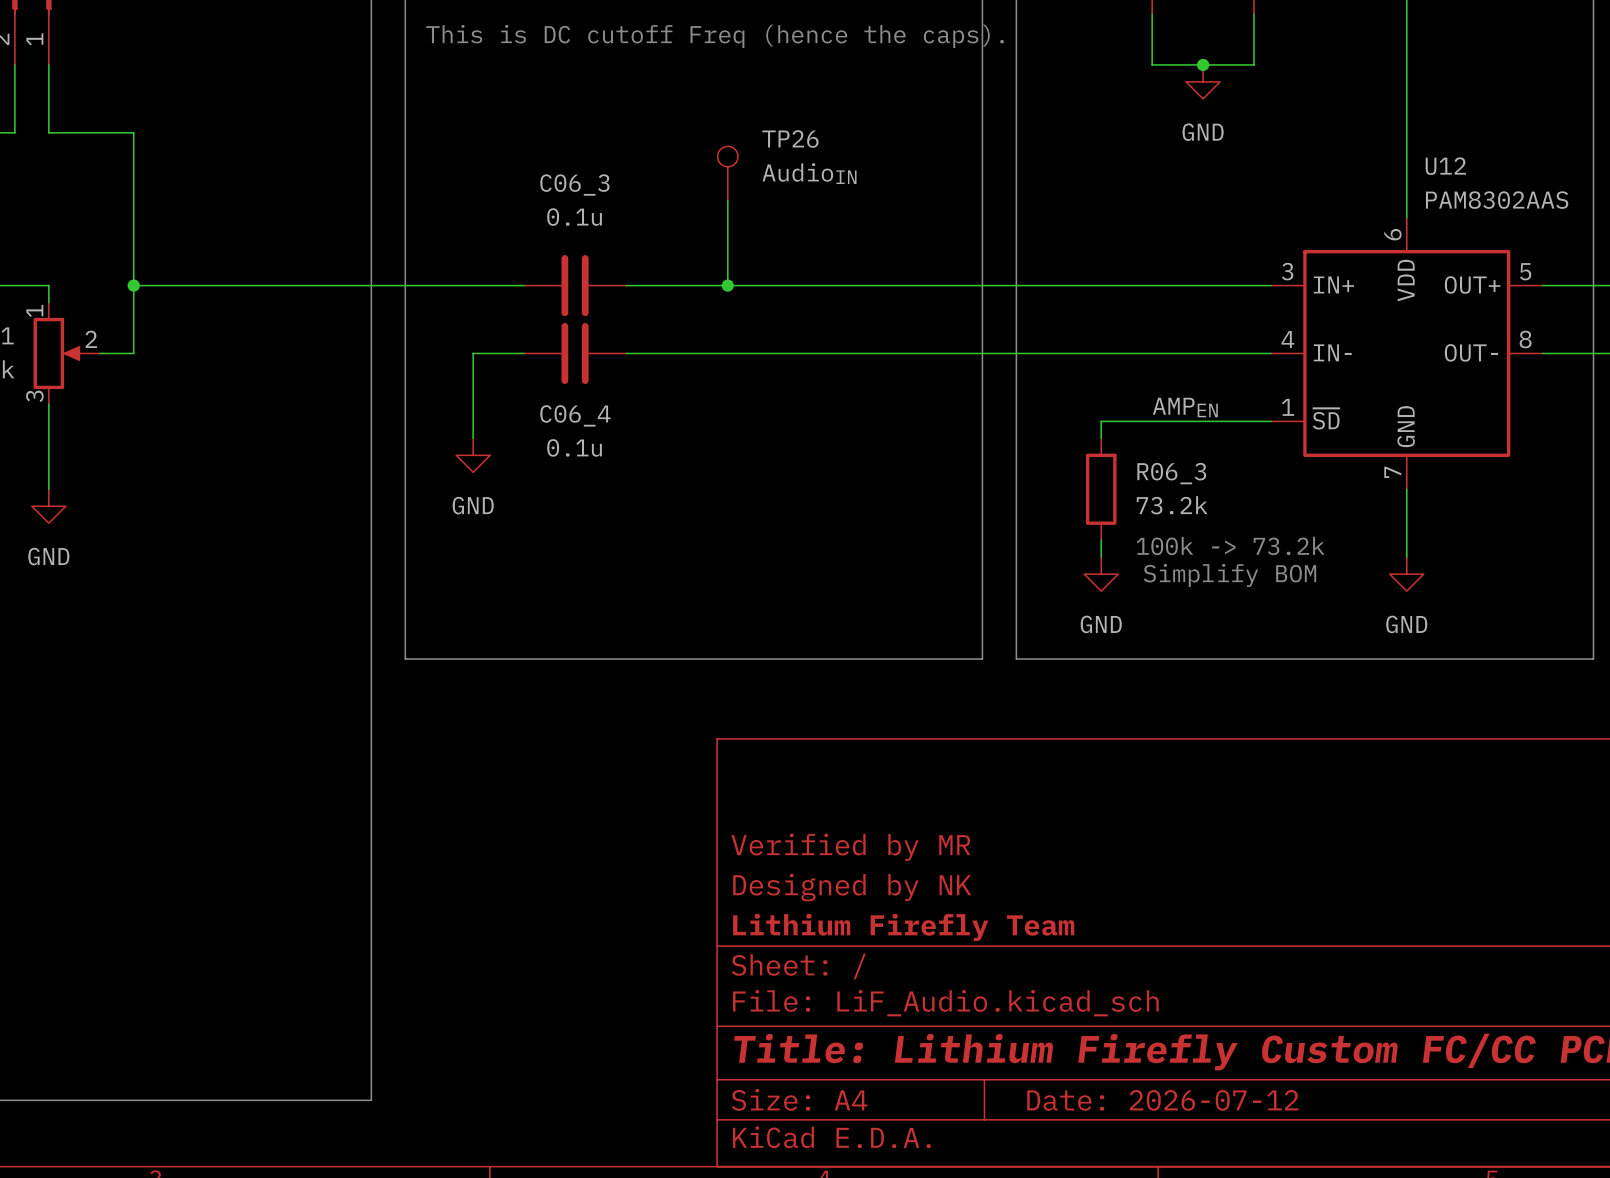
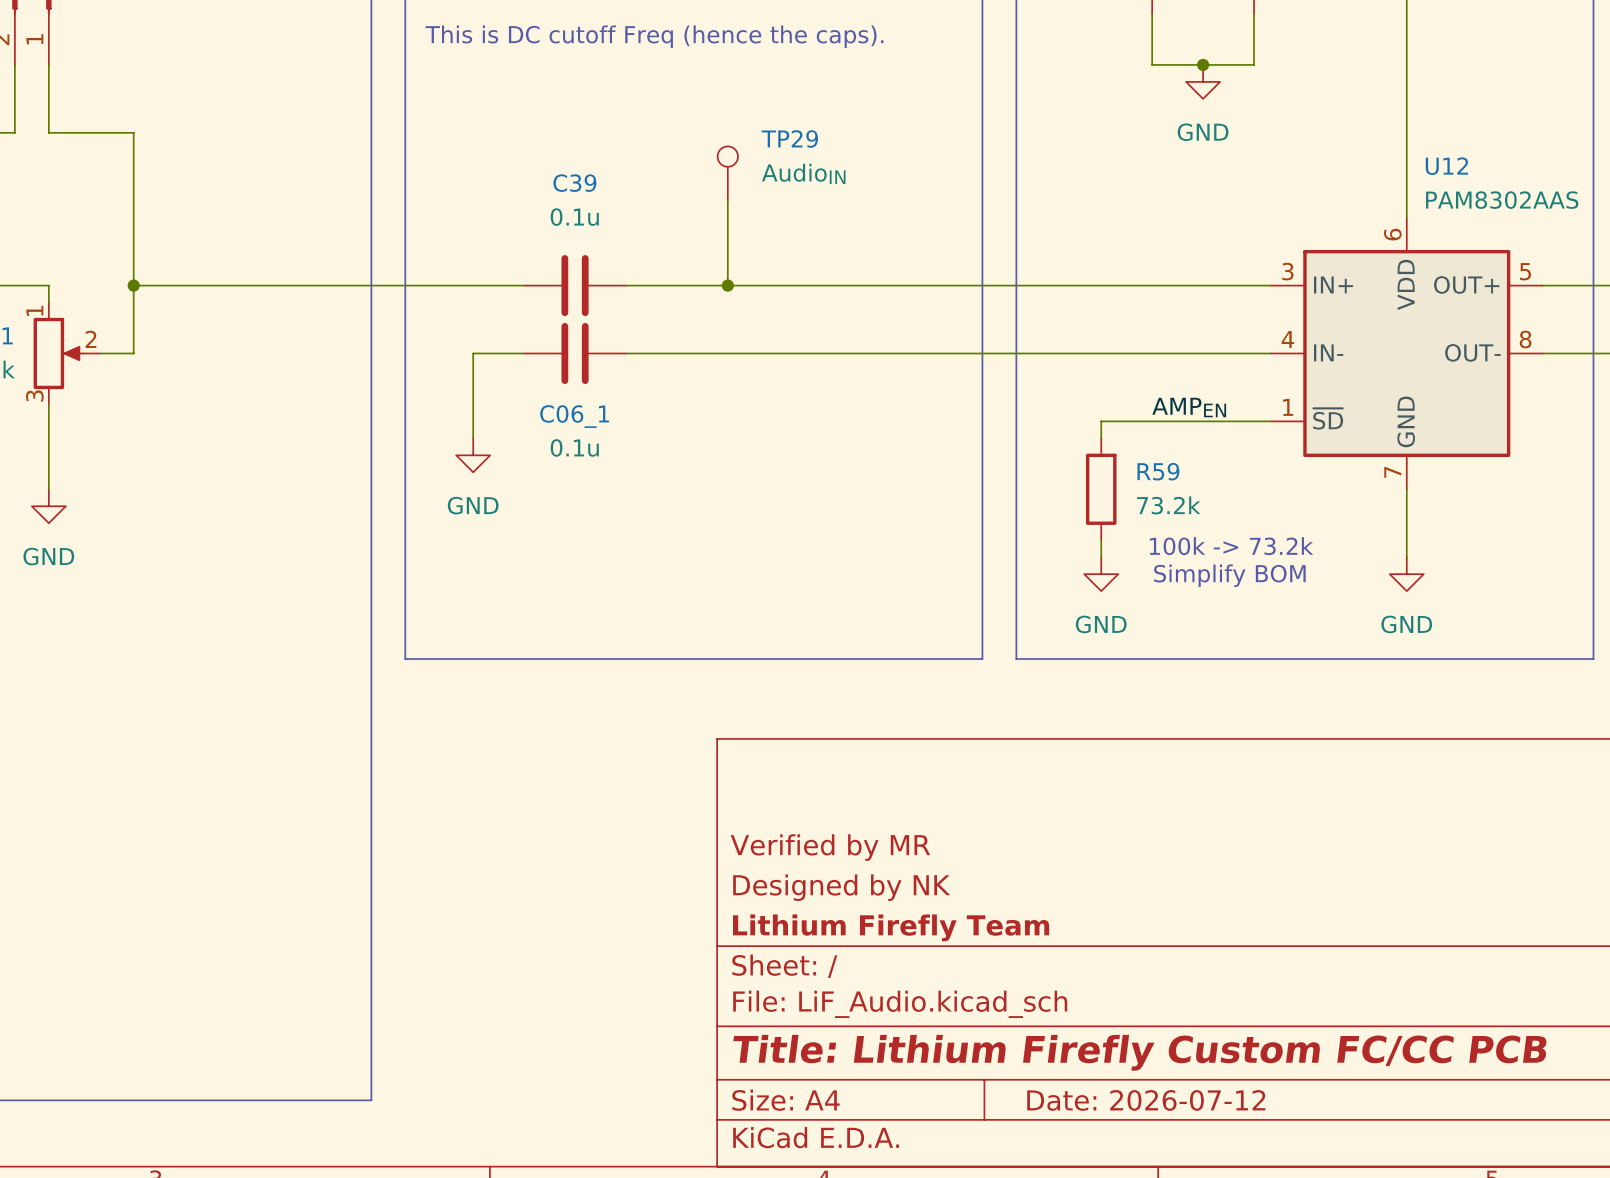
TP26 name: TP26 (790, 138) -> TP29 (789, 138)
C06_3 name: C06_3 (574, 185) -> C39 (574, 183)
C06_4 name: C06_4 (575, 415) -> C06_1 (574, 416)
R06_3 name: R06_3 (1171, 473) -> R59 (1158, 471)

